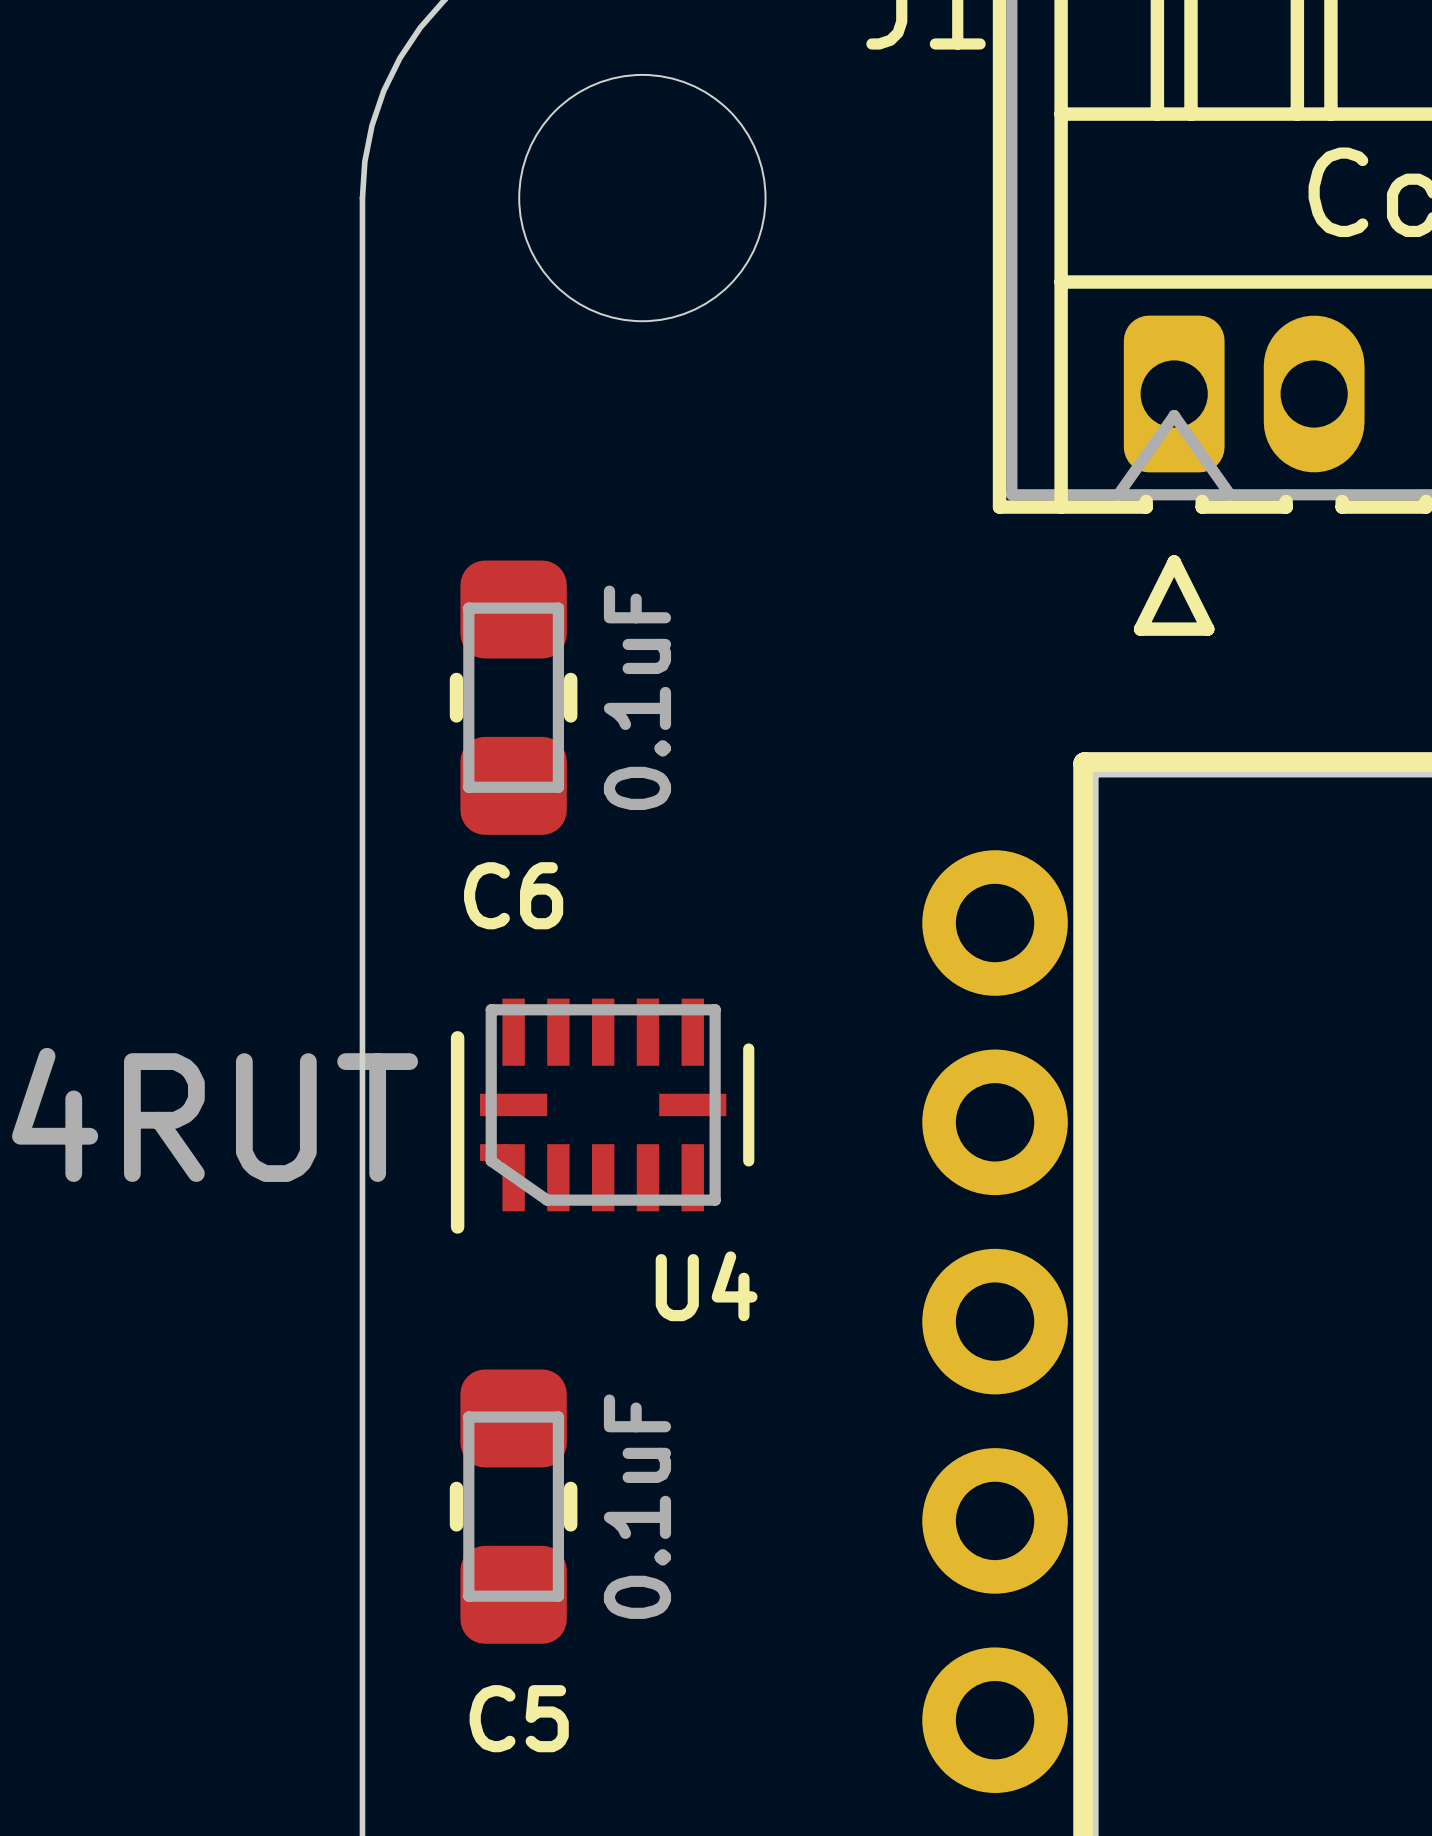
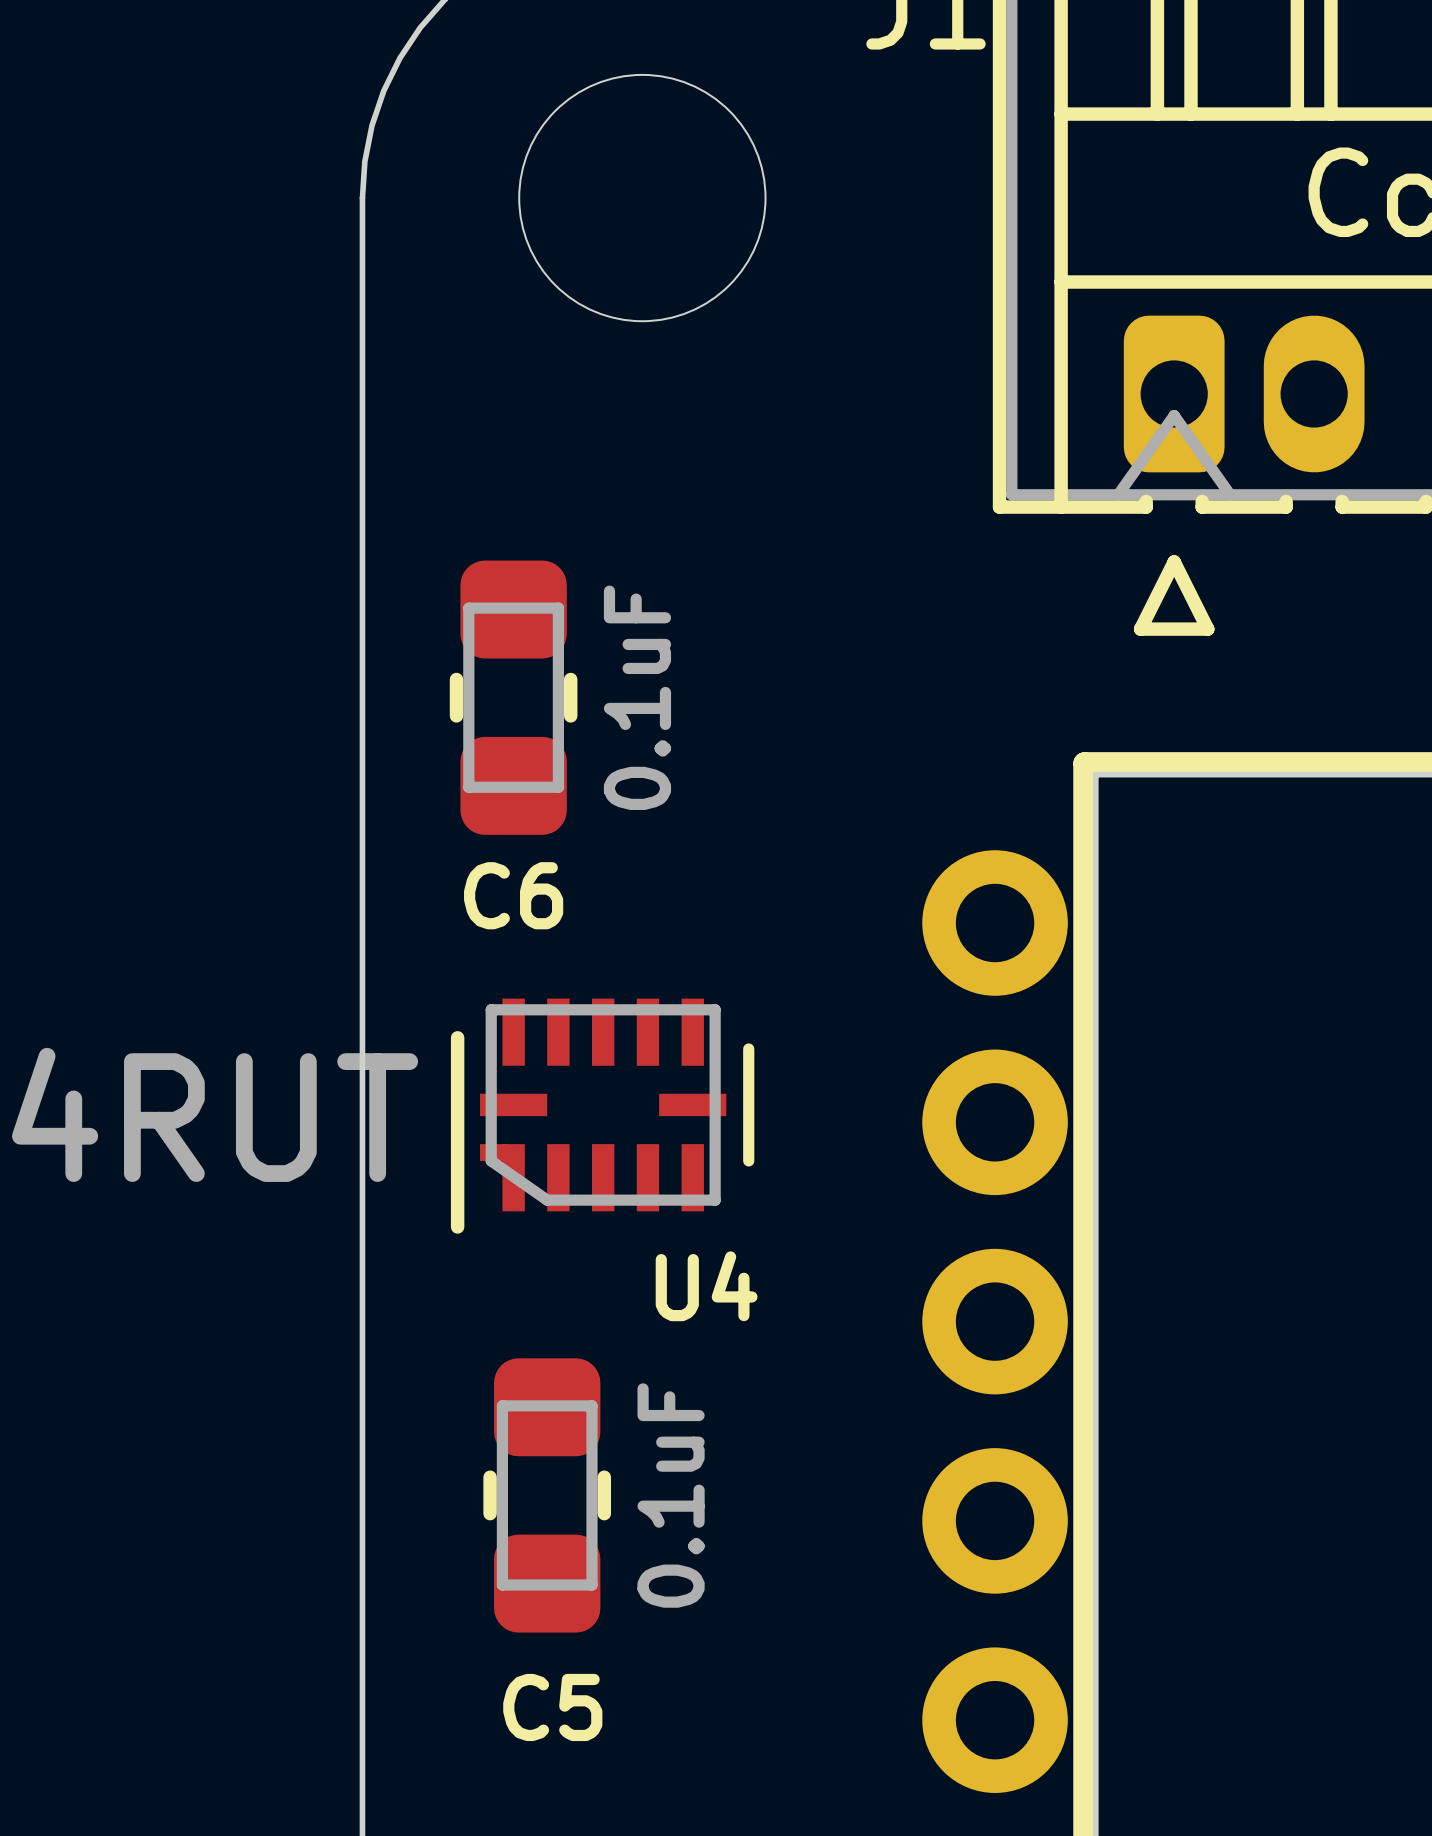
C5 position: (513, 1506) -> (547, 1495)

